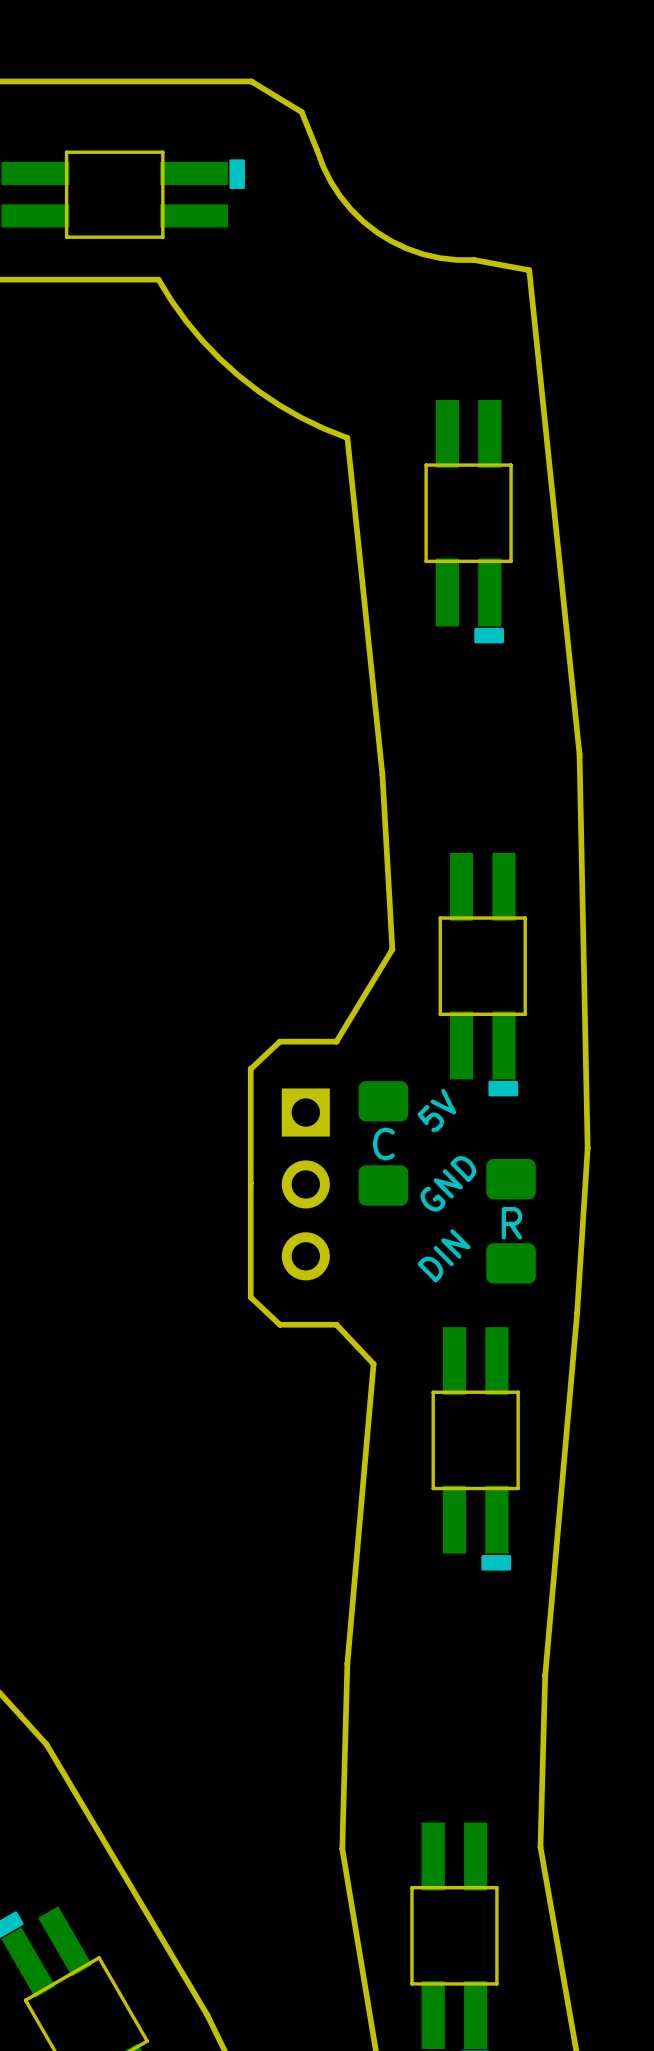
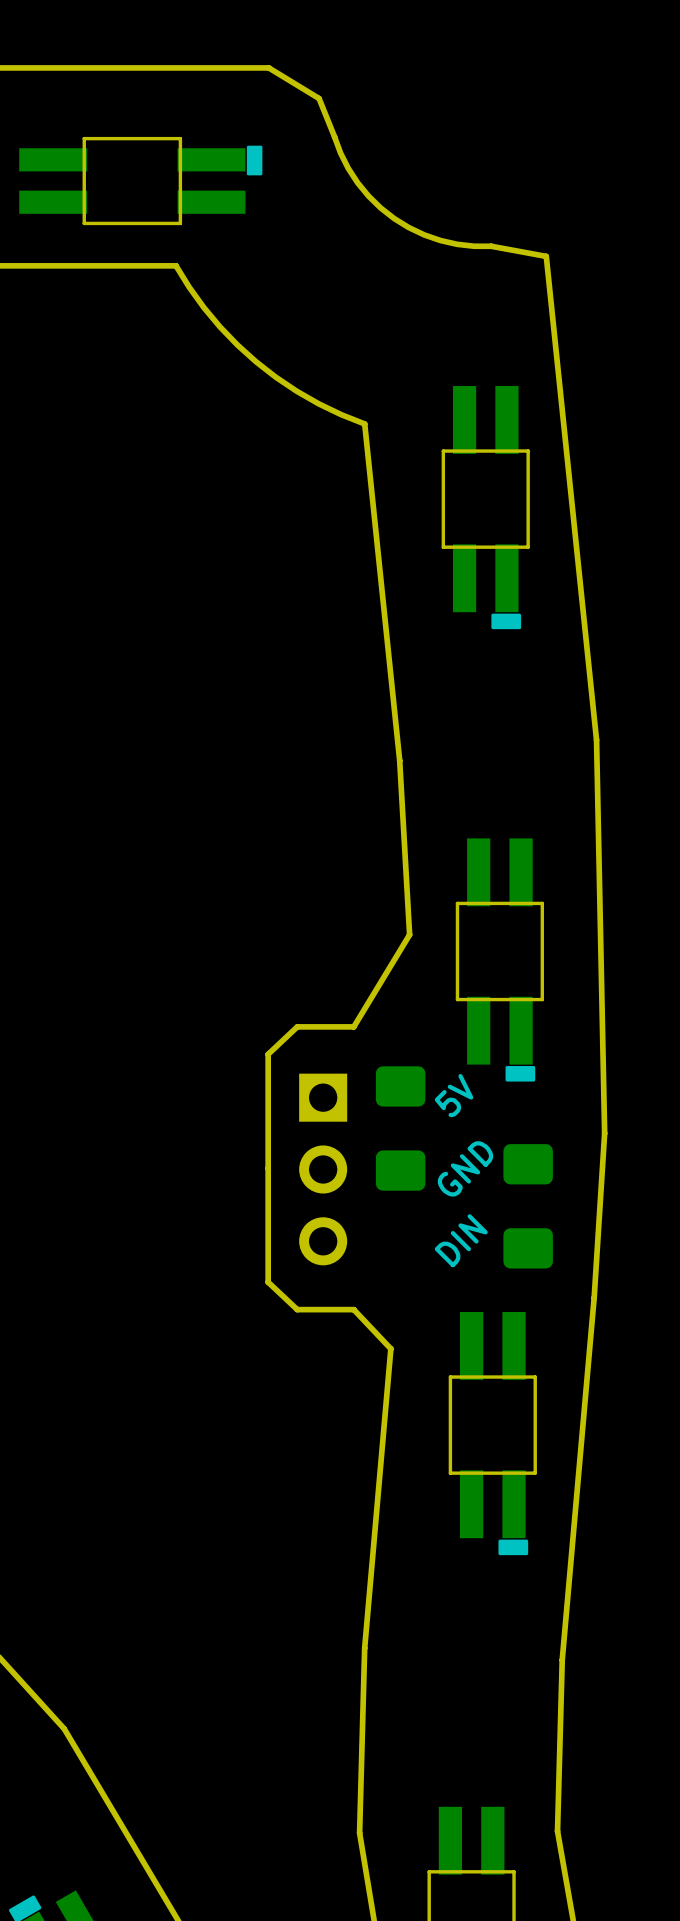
text: C (383, 1143) -> none
text: R (511, 1223) -> none

